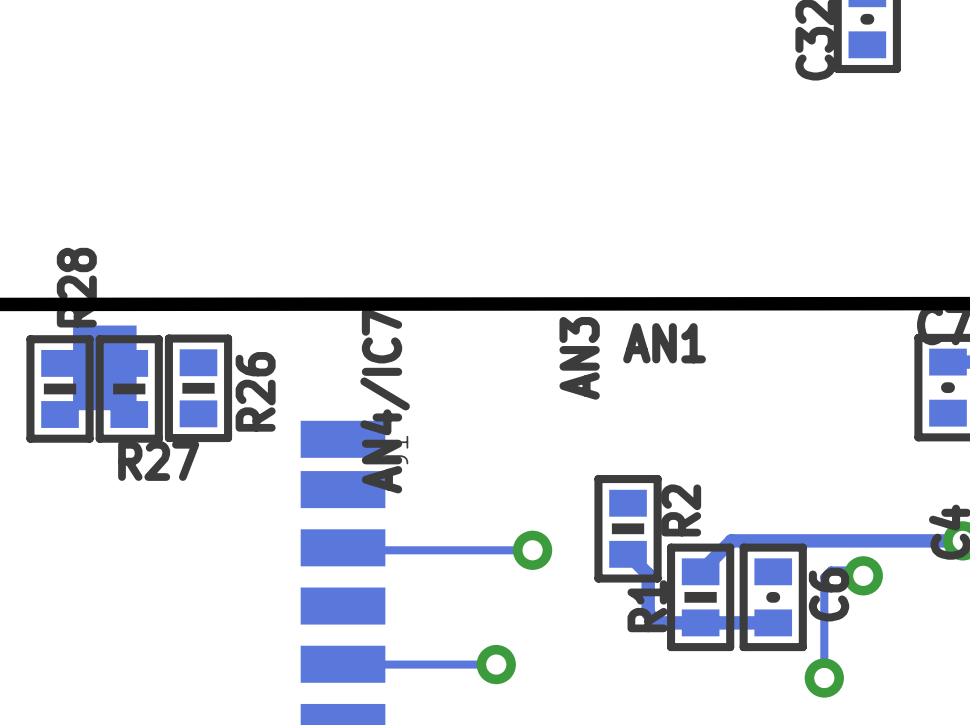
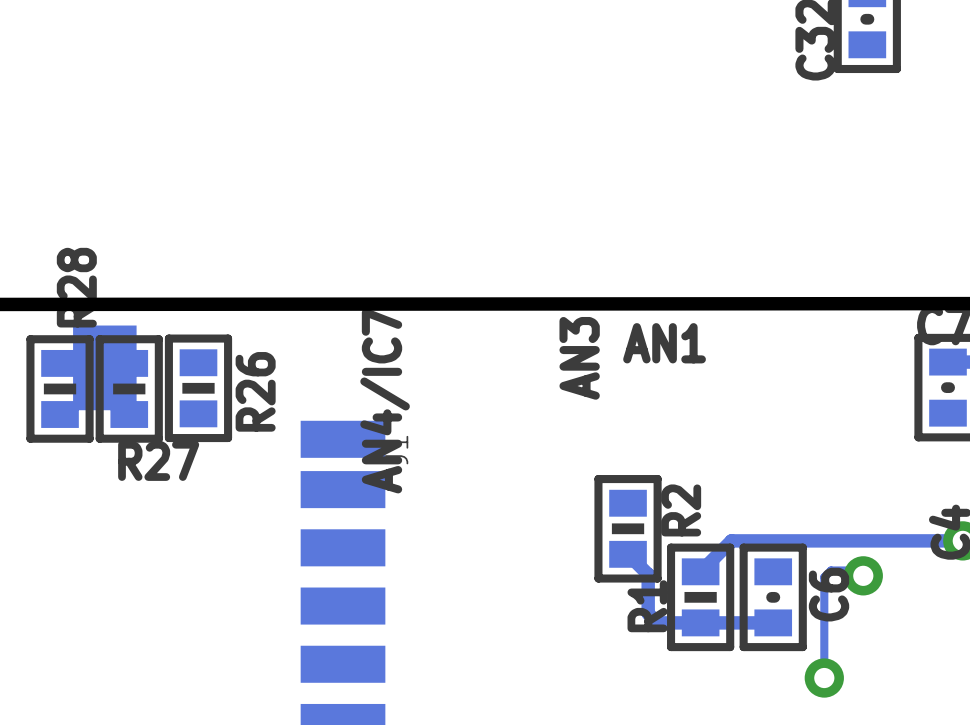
track: (343, 547) (345, 550) (532, 550) -> none
via: (532, 550) -> none
track: (496, 664) (343, 664) -> none
via: (496, 664) -> none

